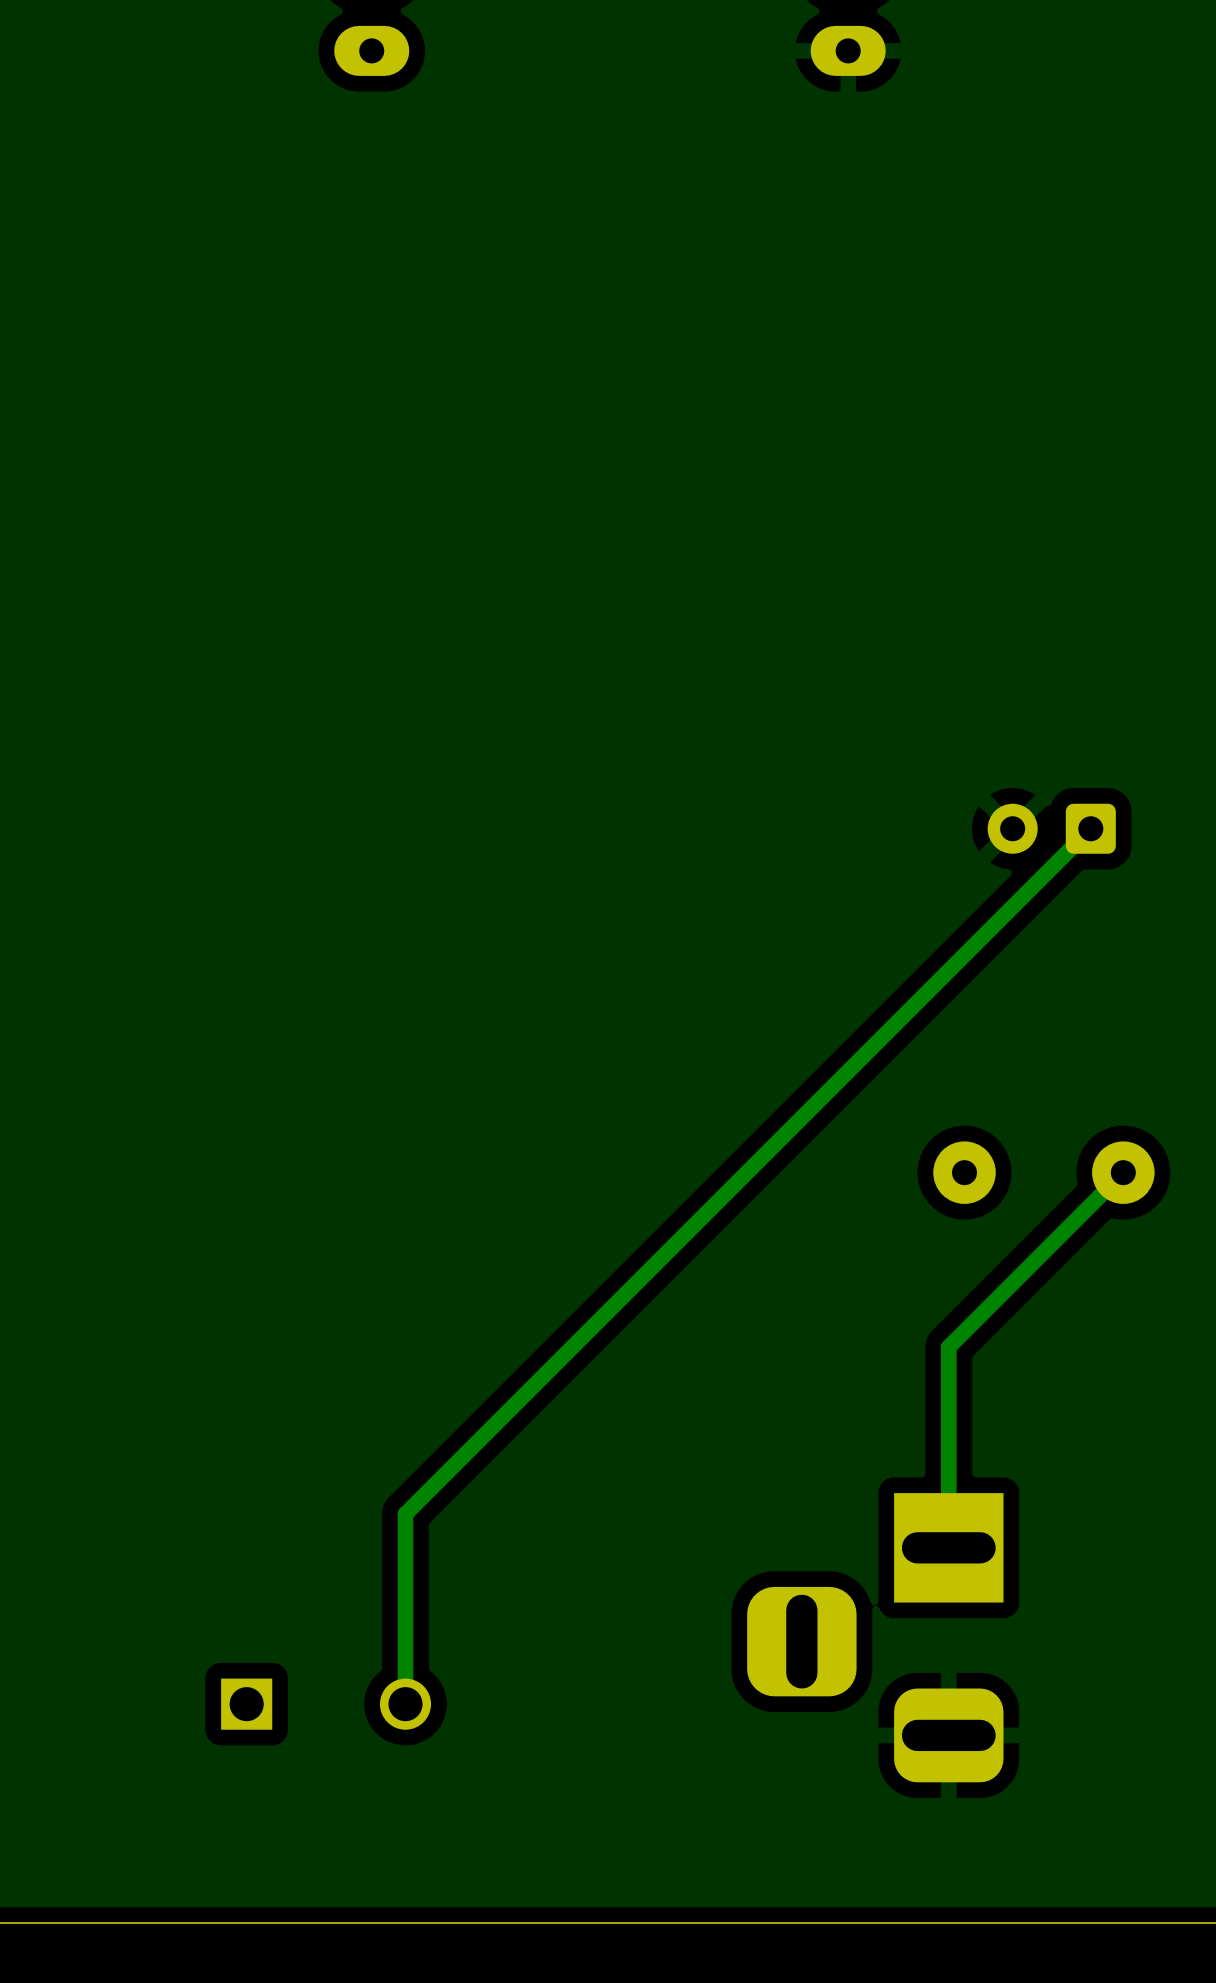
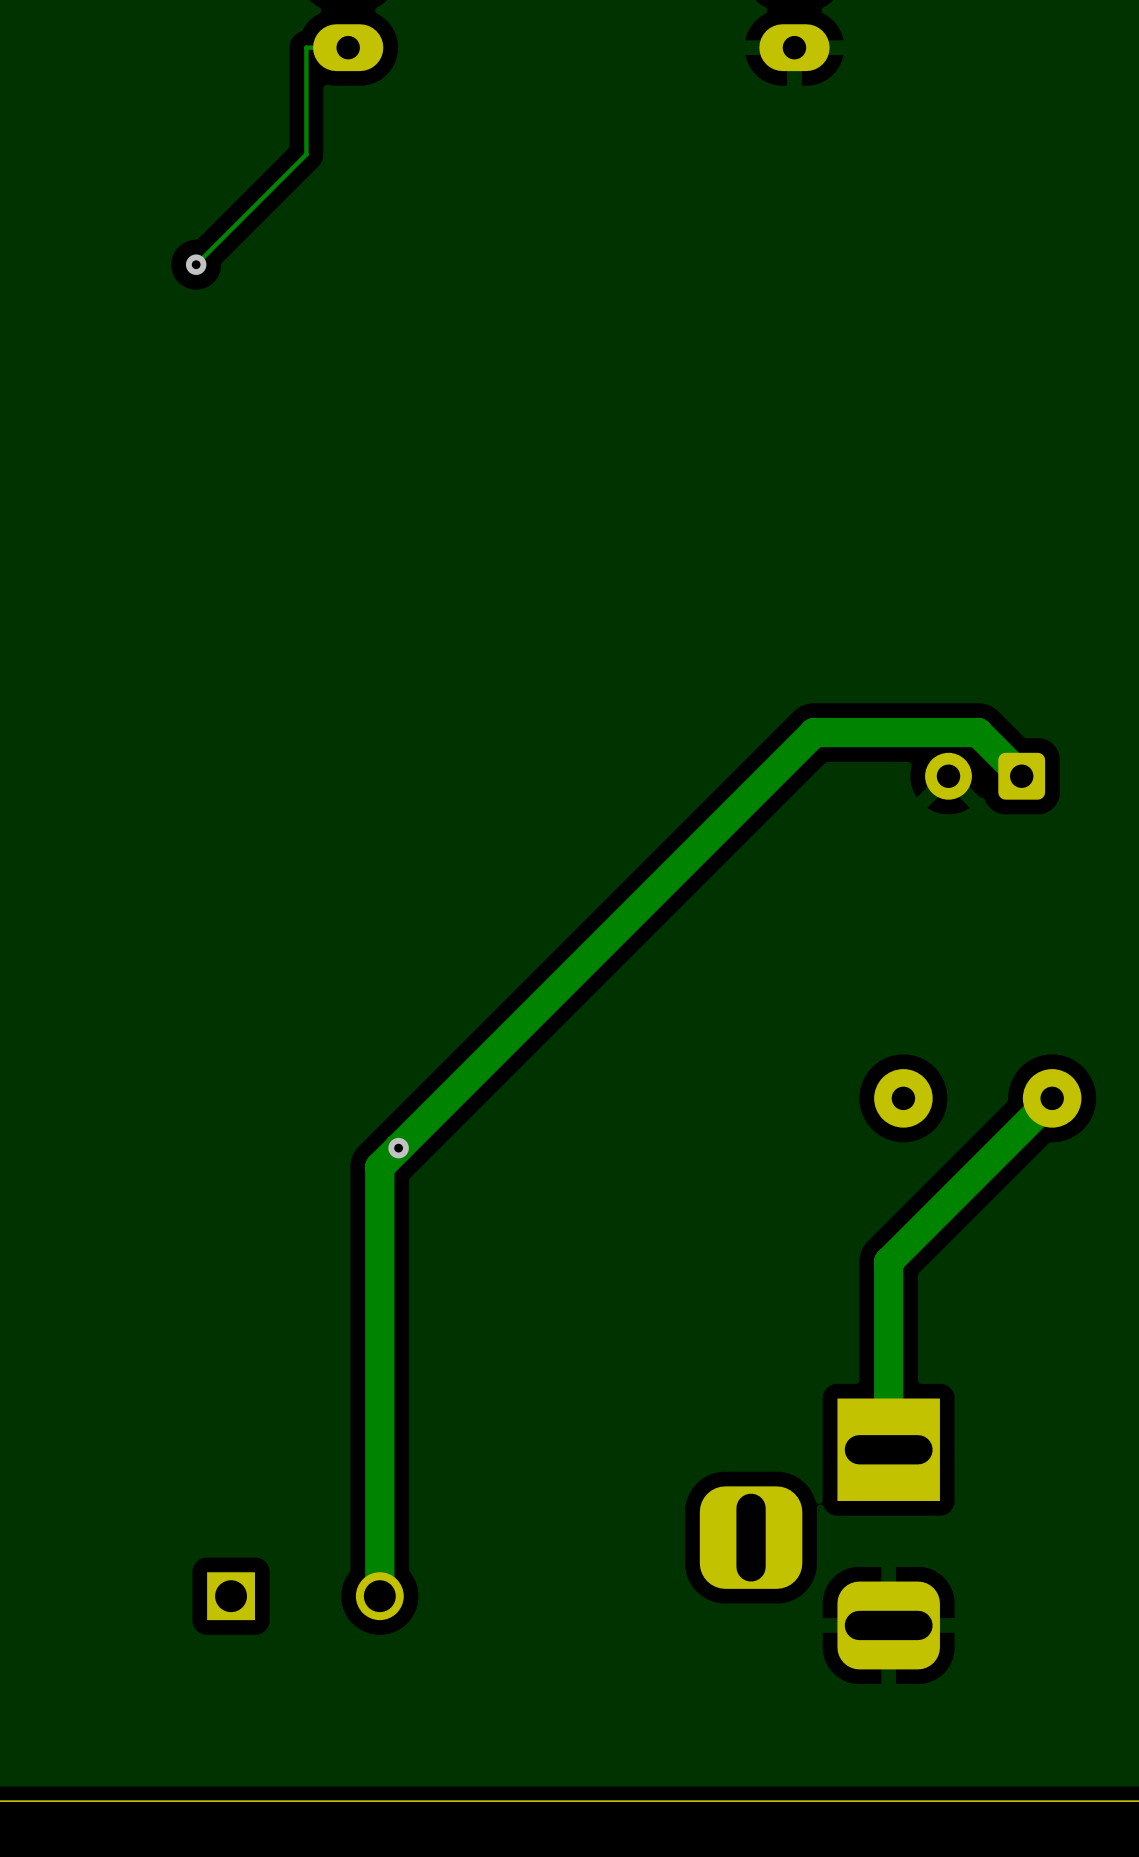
track: none -> (348, 47) (306, 47) (306, 154) (196, 264)
via: none -> (196, 264)
track: (1090, 828) (405, 1514) -> (1021, 776) (978, 732) (814, 732) (379, 1166) (379, 1418)
track width: thin (1123, 1172) (948, 1347) (948, 1547) -> thick (1052, 1098) (888, 1261) (888, 1449)
via: none -> (398, 1148)
track width: thin (405, 1514) (405, 1704) -> thick (379, 1418) (379, 1596)

